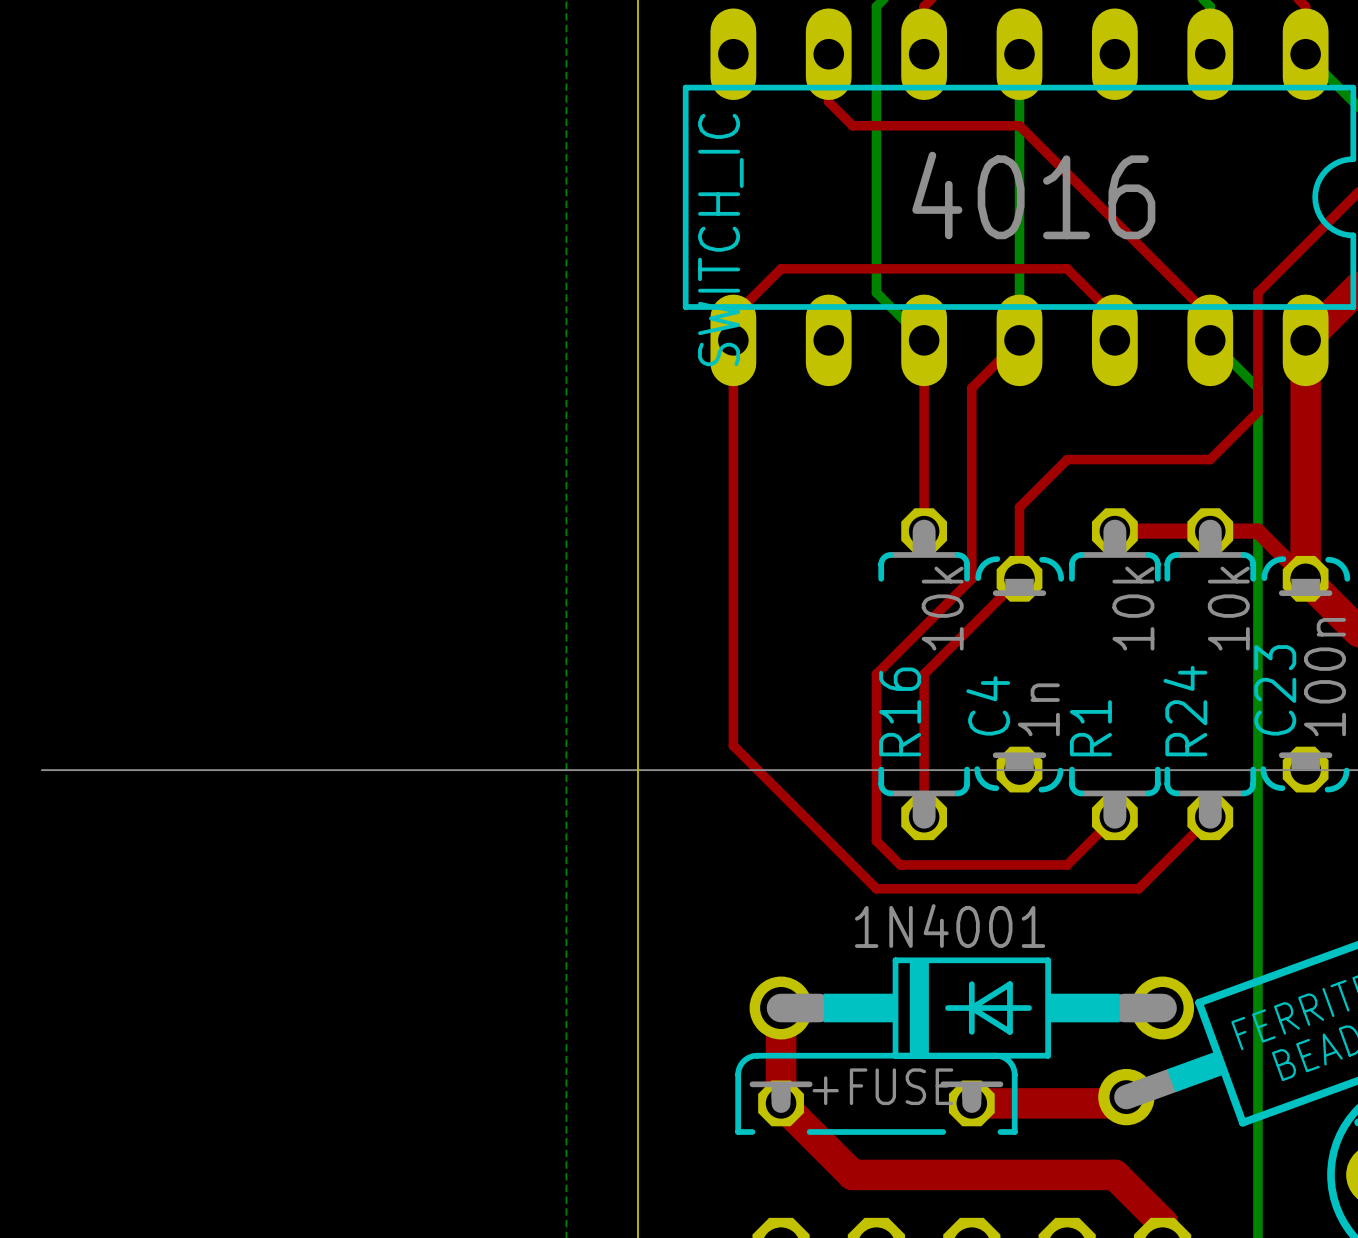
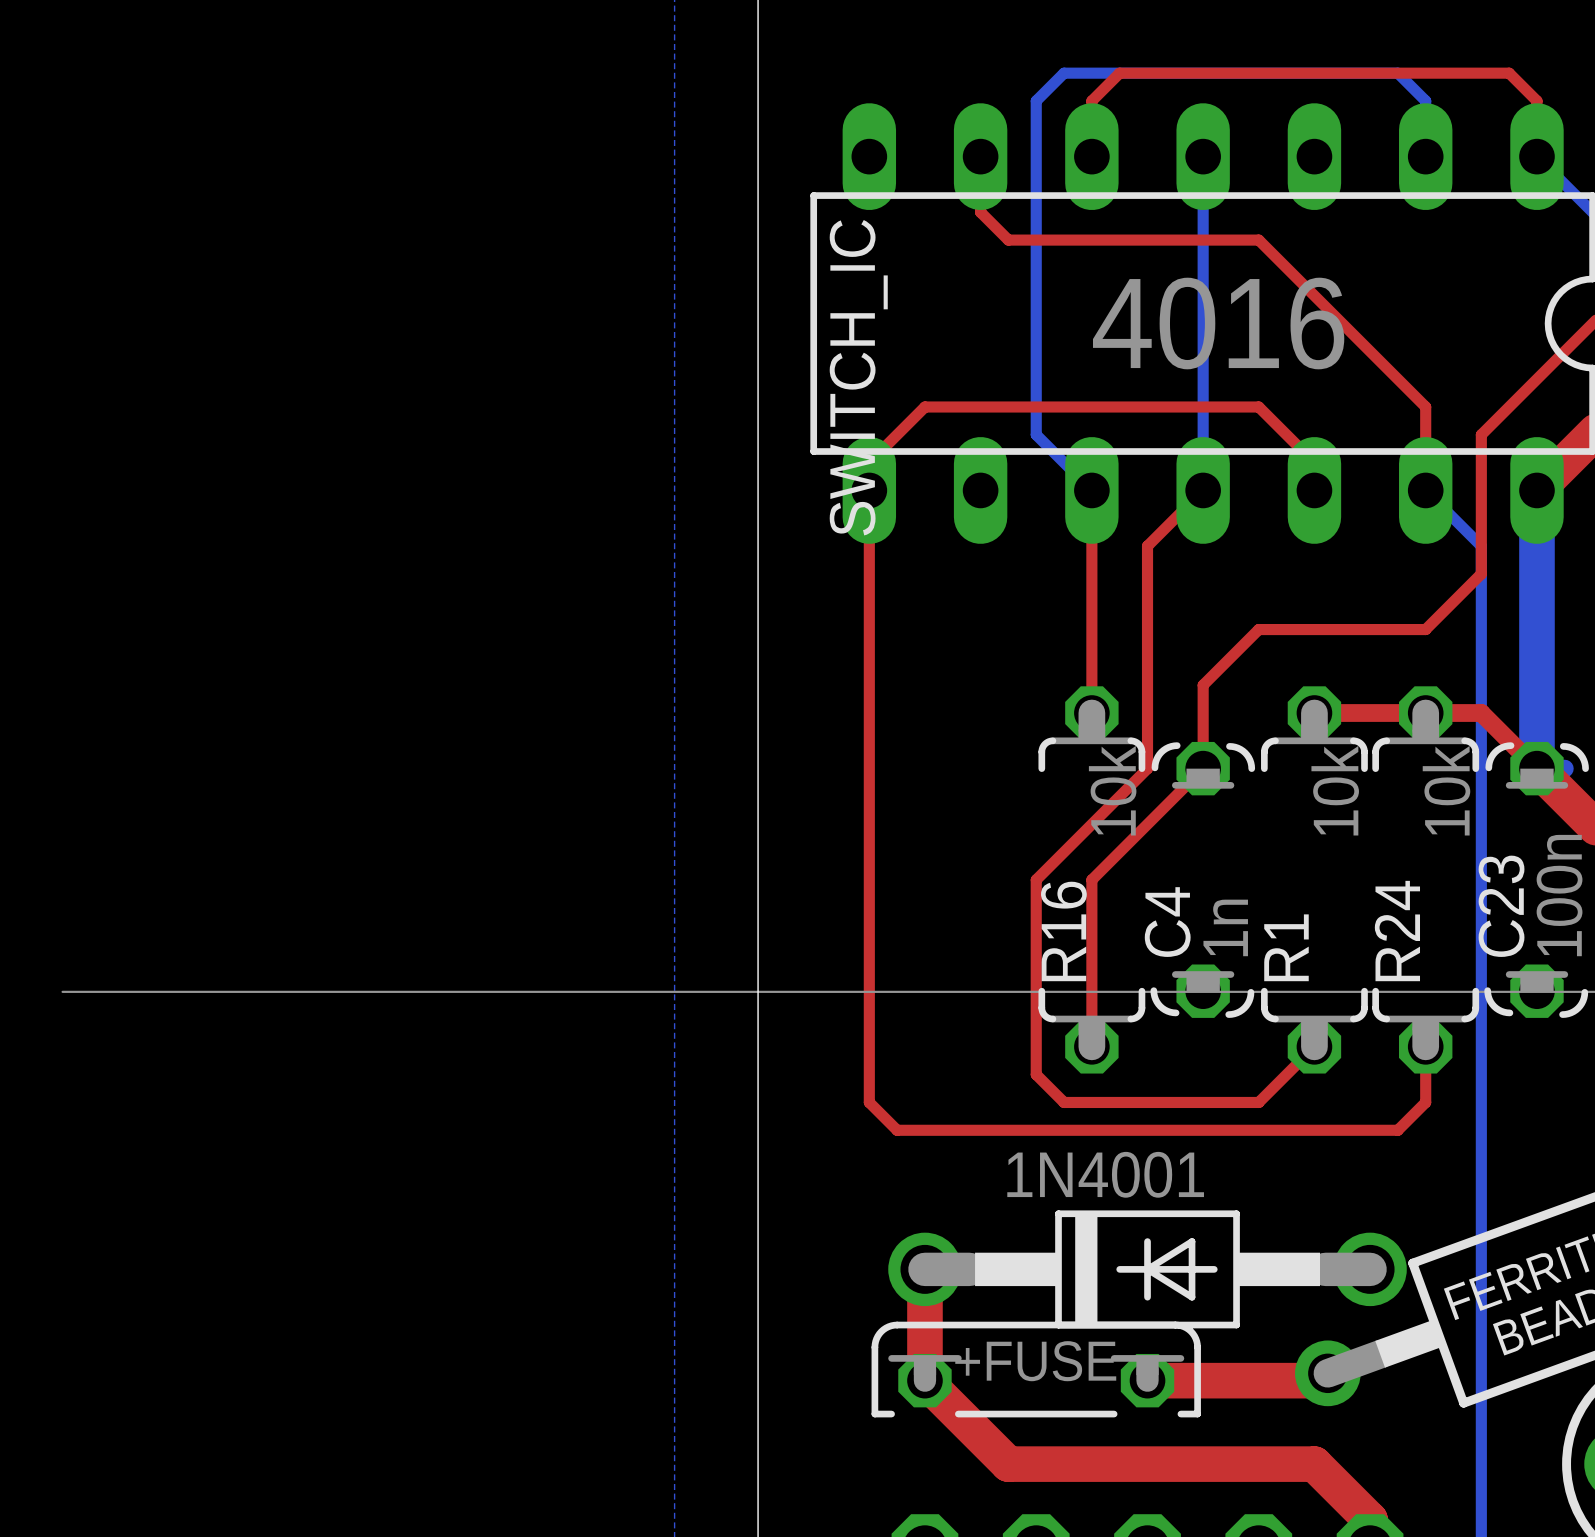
top track: (1019, 125) (1210, 316) -> (1203, 240) (1258, 240) (1425, 407) (1425, 462)
top track: (1305, 340) (1305, 578) -> none
bottom track: none -> (1536, 490) (1536, 768) (1564, 768)
top track: (733, 745) (876, 888) -> (869, 963) (869, 1102) (897, 1130) (1036, 1130)
top track: (1210, 817) (1138, 888) -> (1425, 1046) (1425, 1102) (1397, 1130) (1342, 1130)

